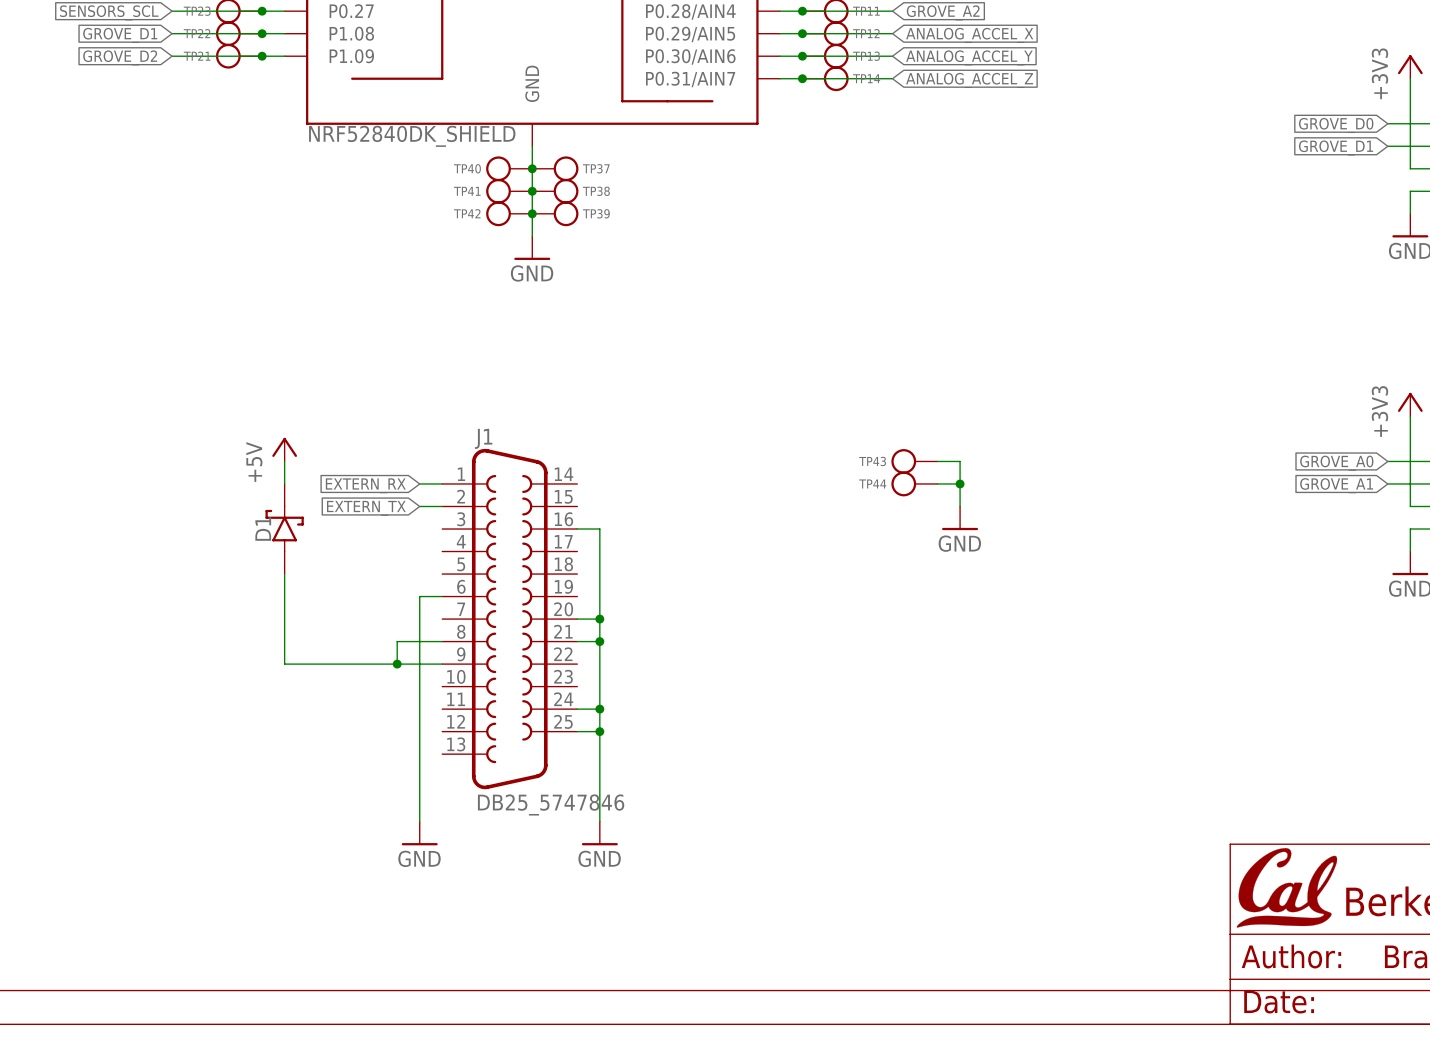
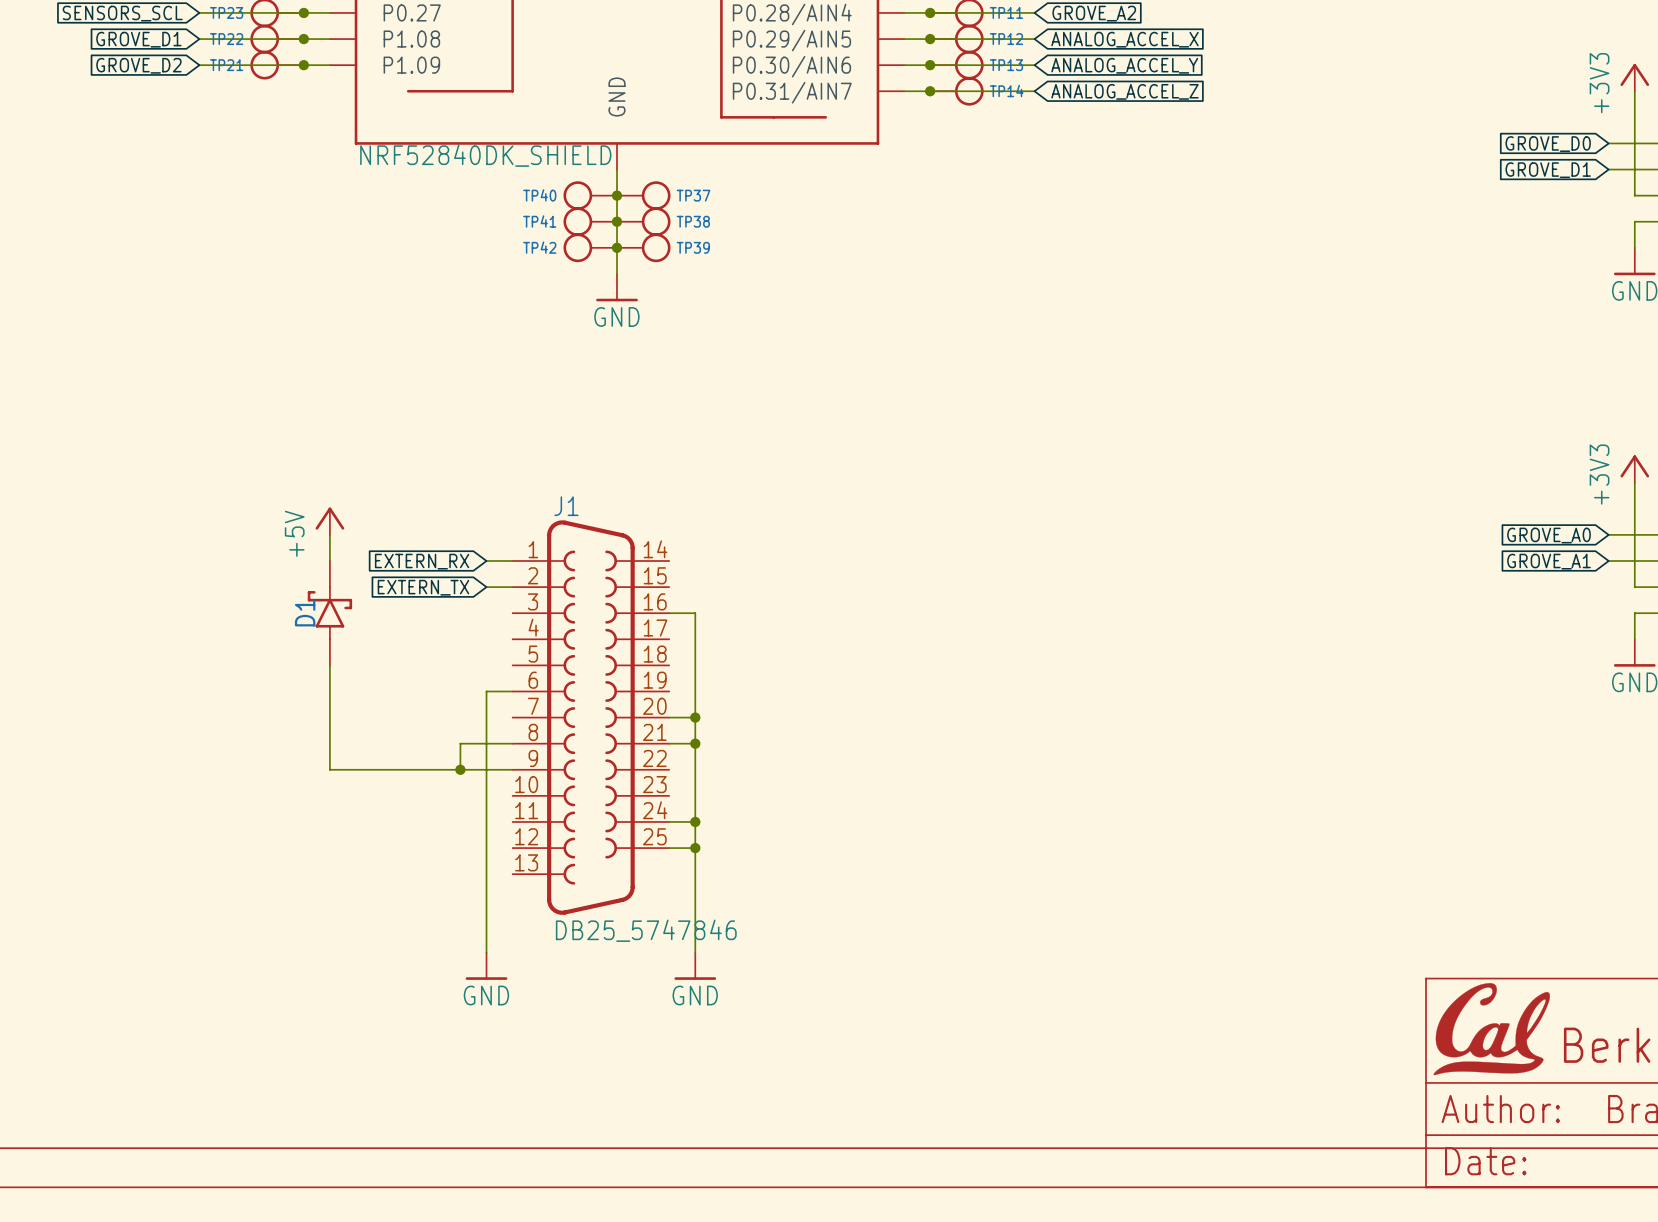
TP43: (914, 461) -> none
wire: (937, 461) (960, 461) (960, 506) -> none
TP44: (914, 483) -> none
wire: (937, 483) (960, 483) -> none
junction: (960, 483) -> none
power symbol: GND (960, 518) -> none

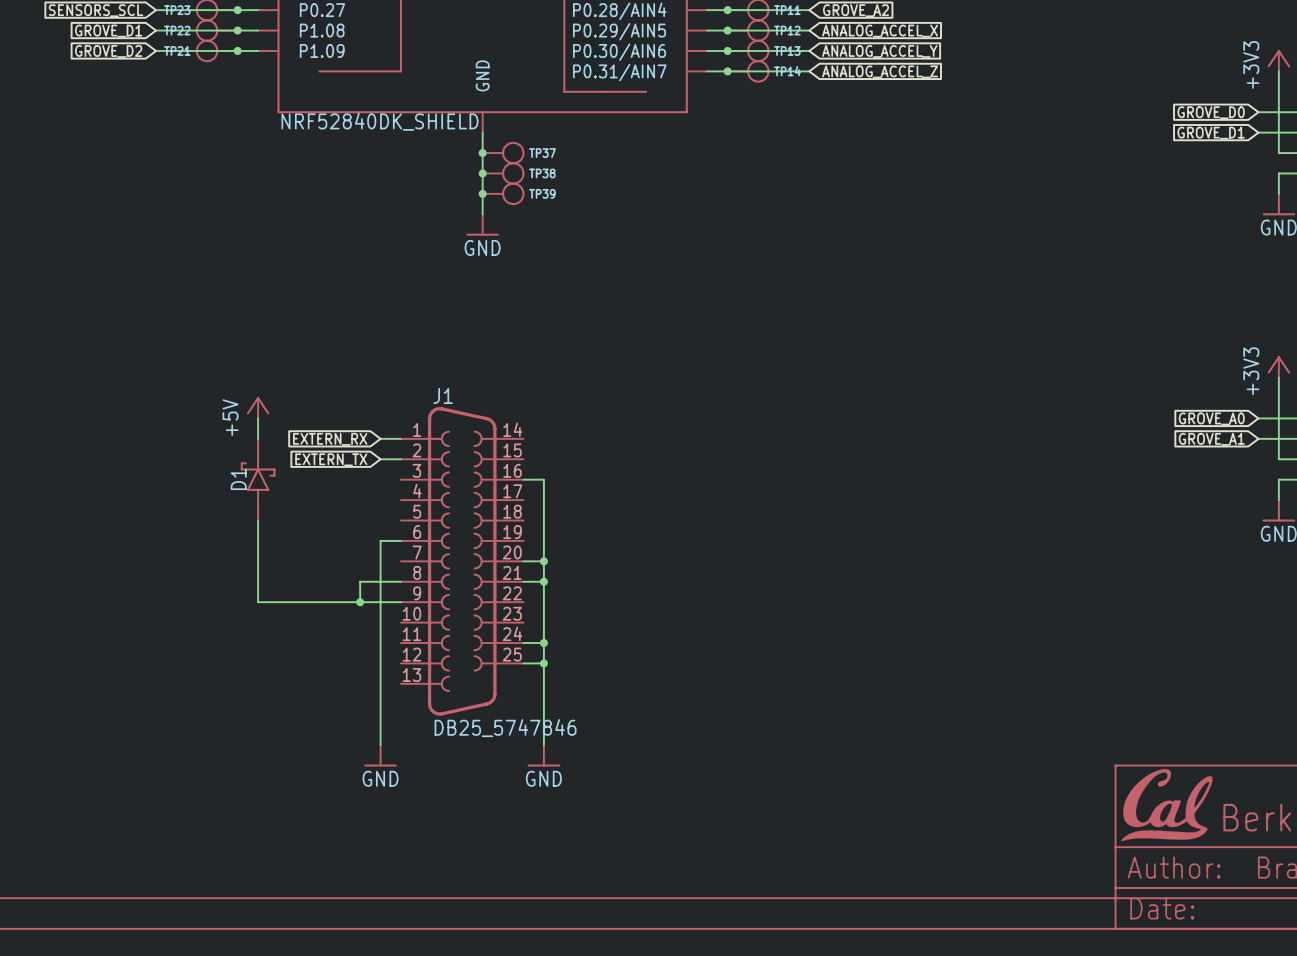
TP40: (590, 195) -> none
TP41: (590, 221) -> none
TP42: (590, 247) -> none

